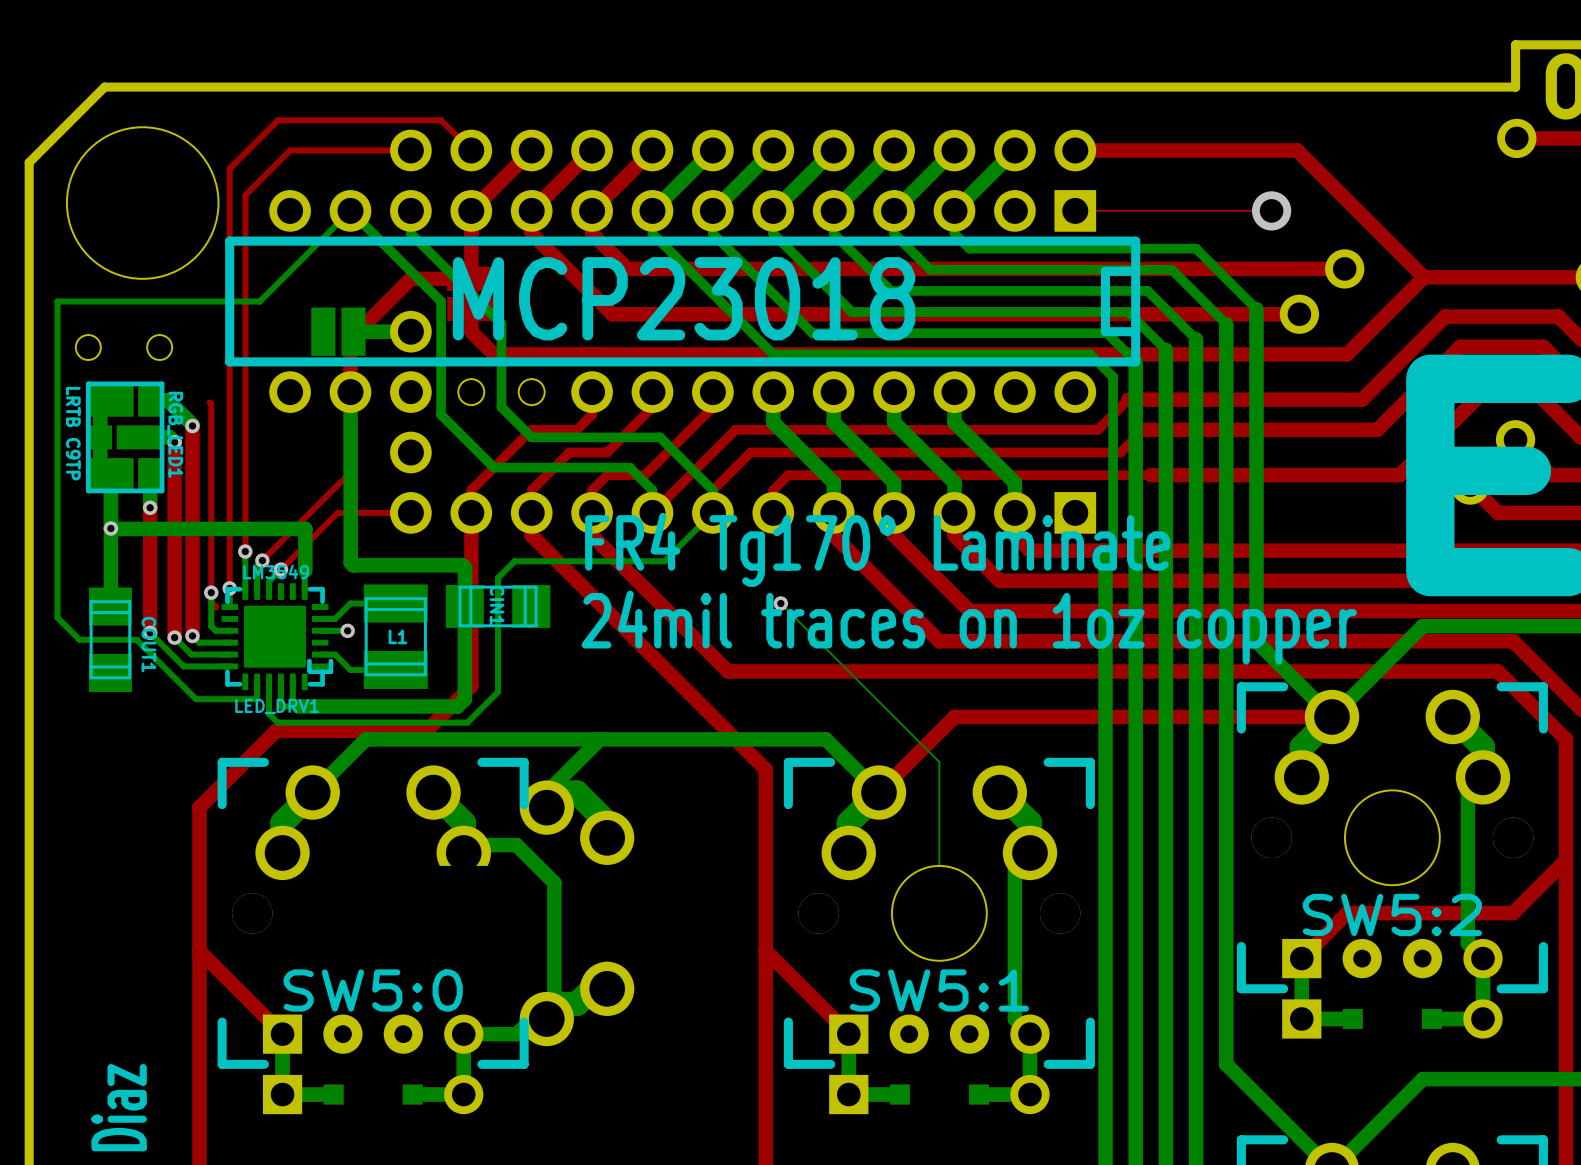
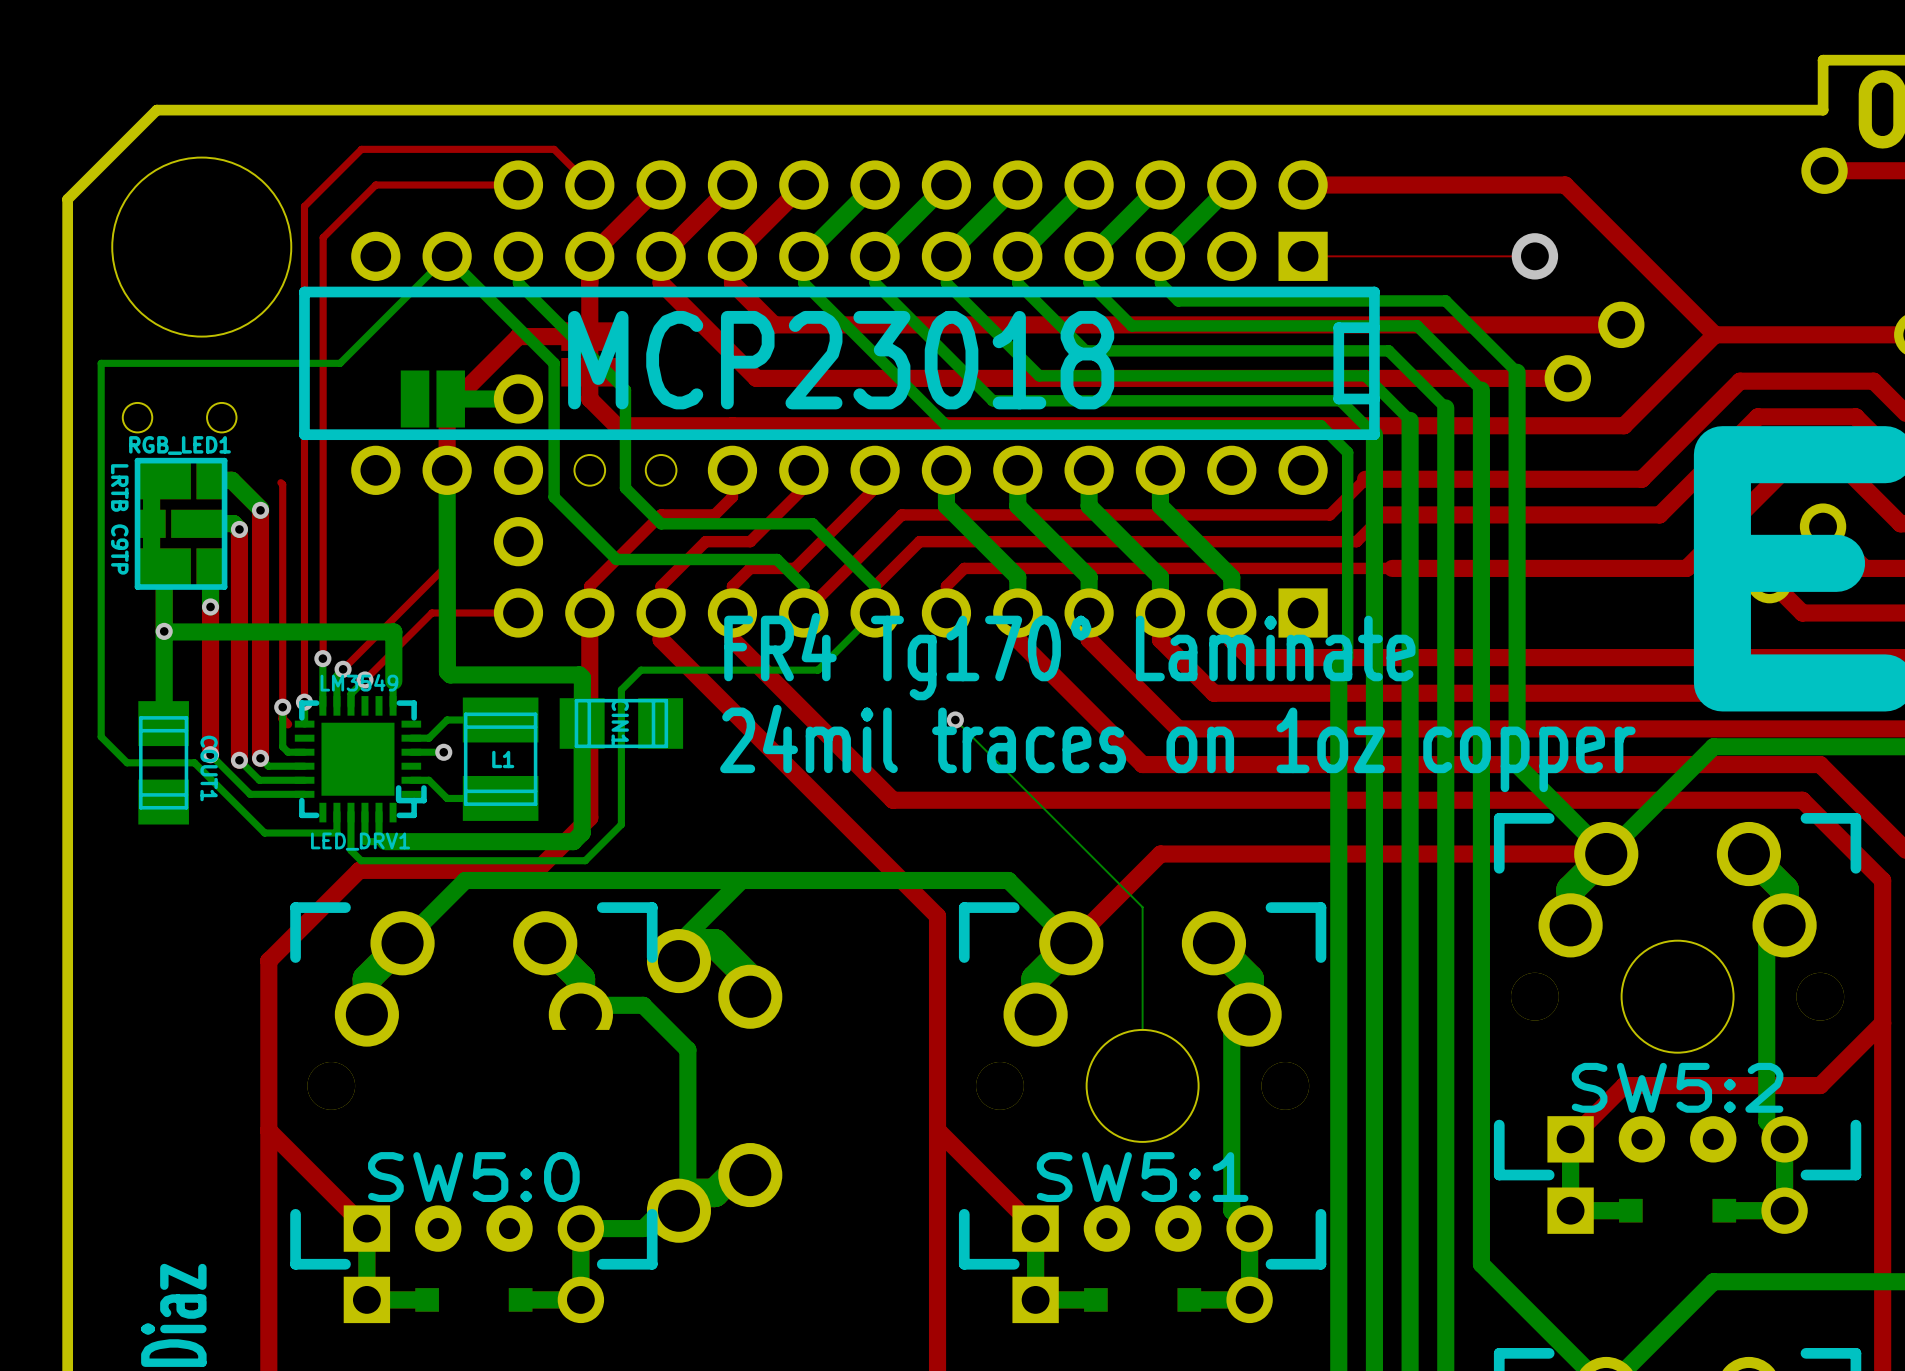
LRTB C9TP value rotation: 0° (175, 434) -> 90° counterclockwise (179, 445)

